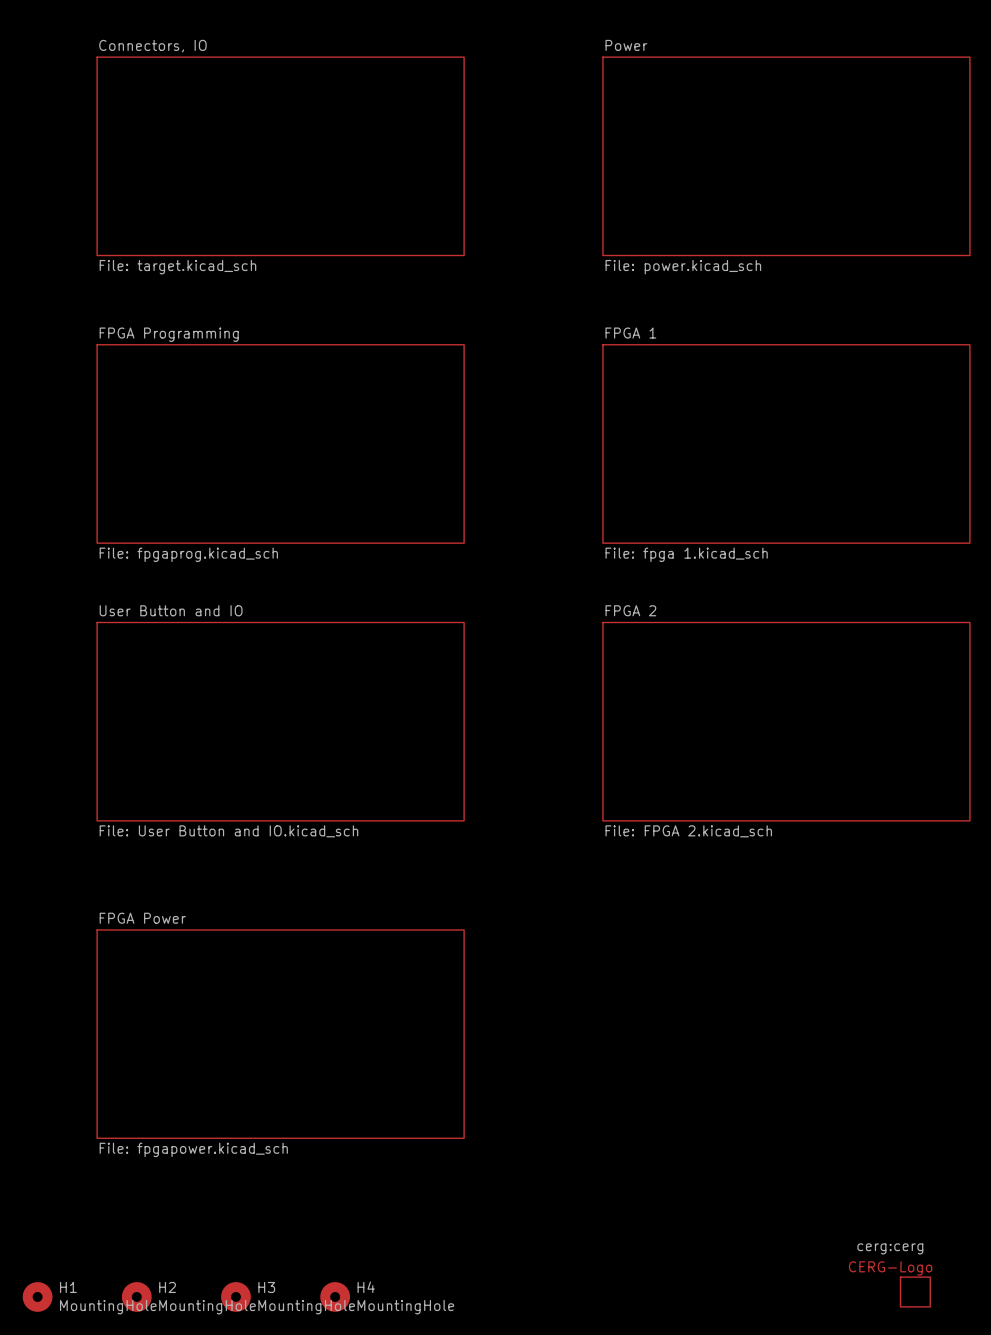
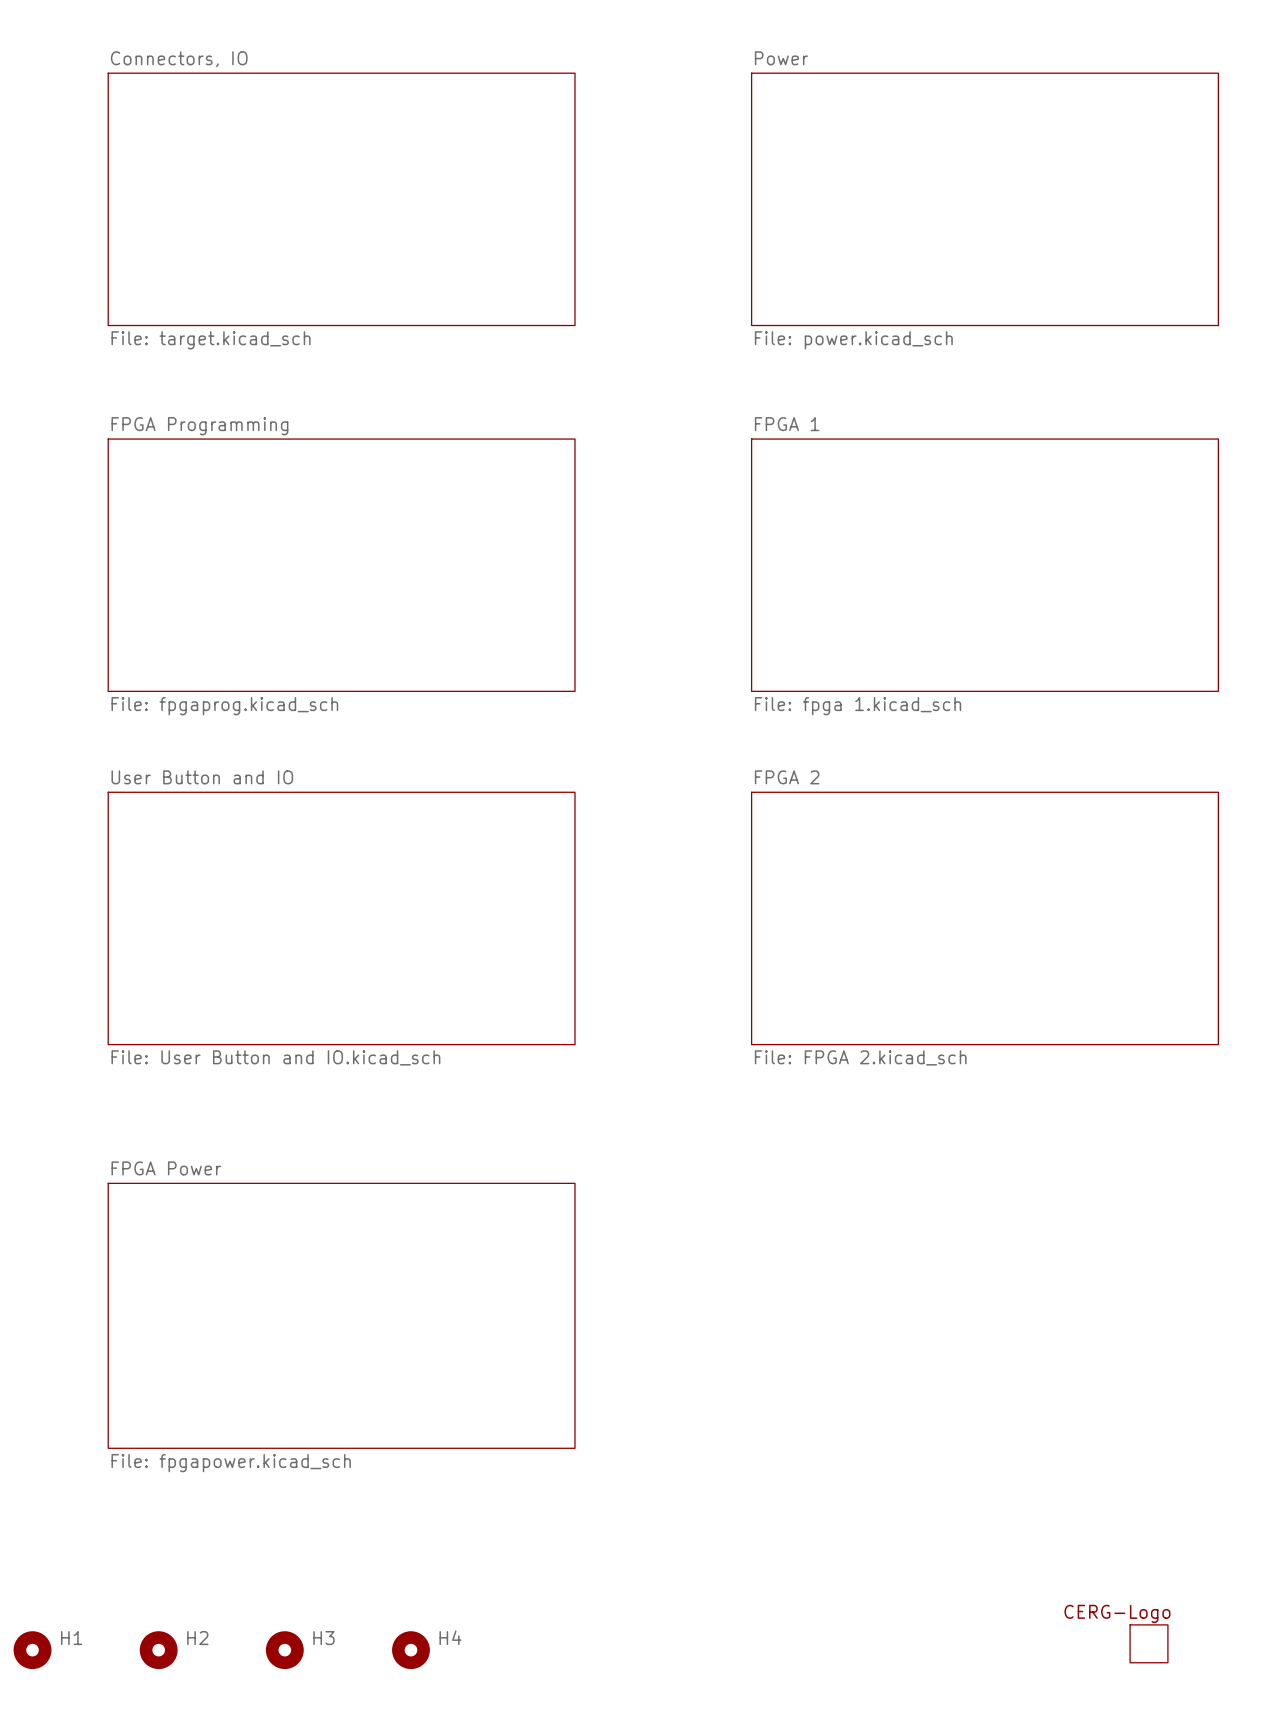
power symbol text: cerg:cerg (890, 1248) -> none
H1 value: MountingHole (108, 1307) -> none
H2 value: MountingHole (207, 1307) -> none
H3 value: MountingHole (306, 1307) -> none
H4 value: MountingHole (405, 1307) -> none

